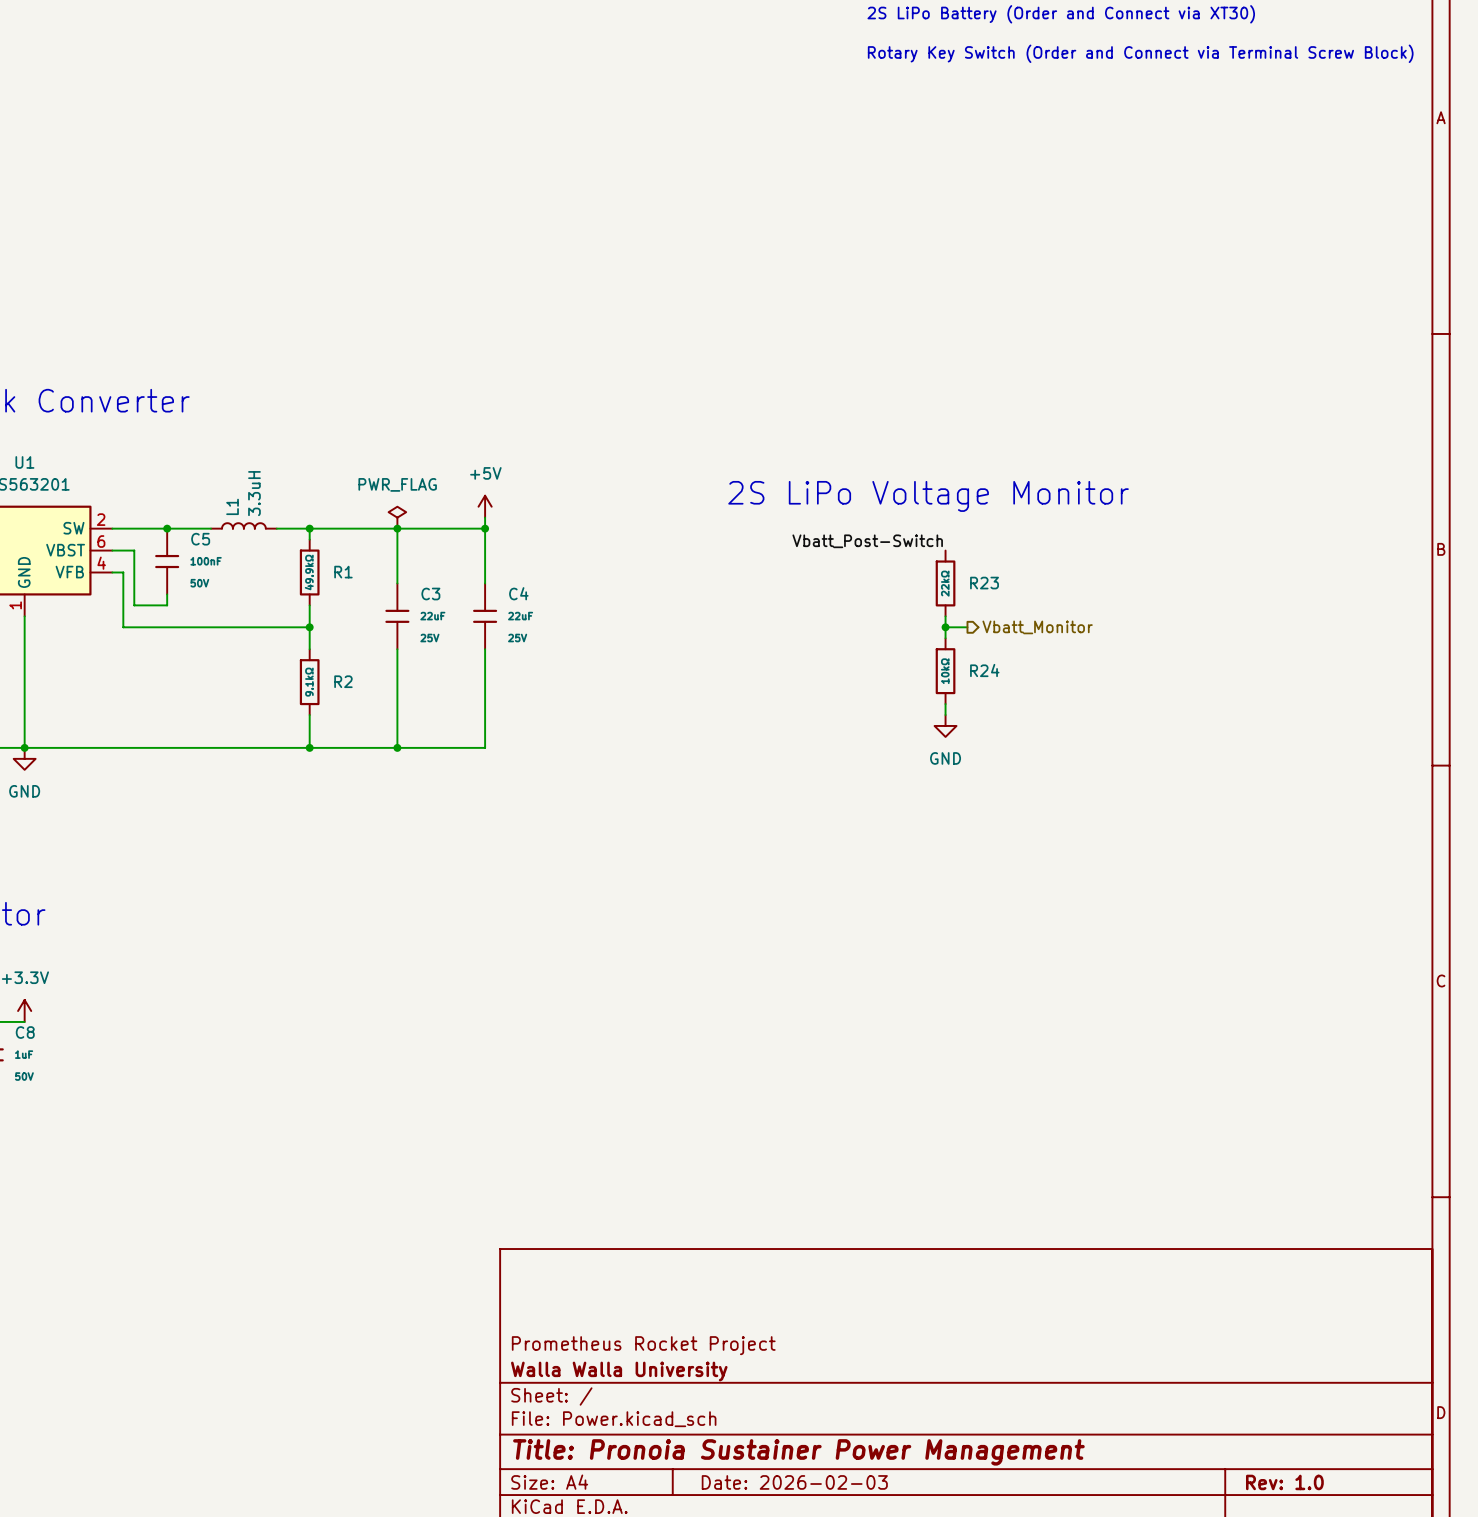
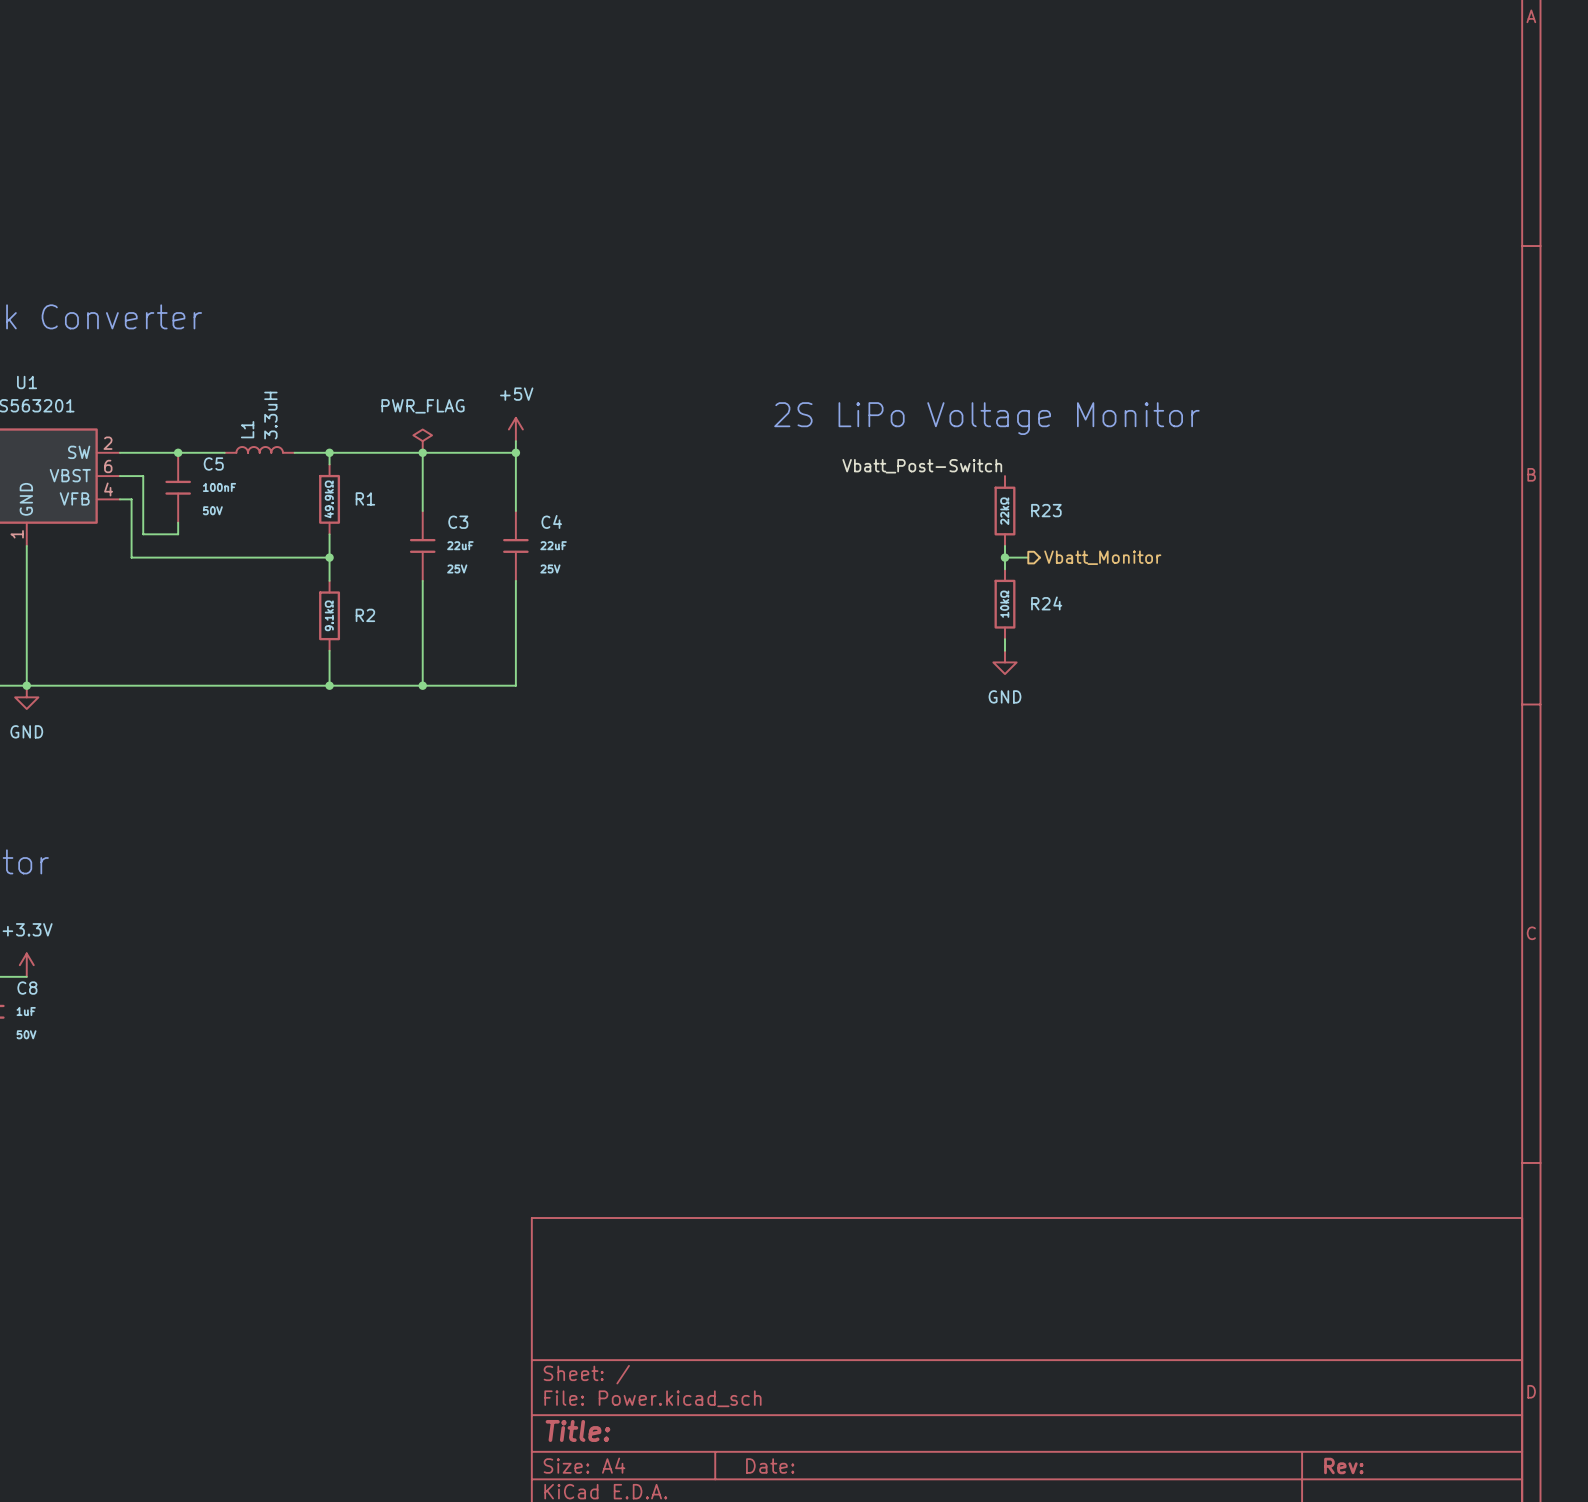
title block: Prometheus Rocket Project (643, 1345) -> none
title block: Walla Walla University (619, 1371) -> none
title block: Title: Pronoia Sustainer Power Management (798, 1452) -> Title: (577, 1430)
title block: Date: 2026-02-03 (794, 1482) -> Date: (770, 1465)
title block: Rev: 1.0 (1284, 1482) -> Rev: (1343, 1465)

